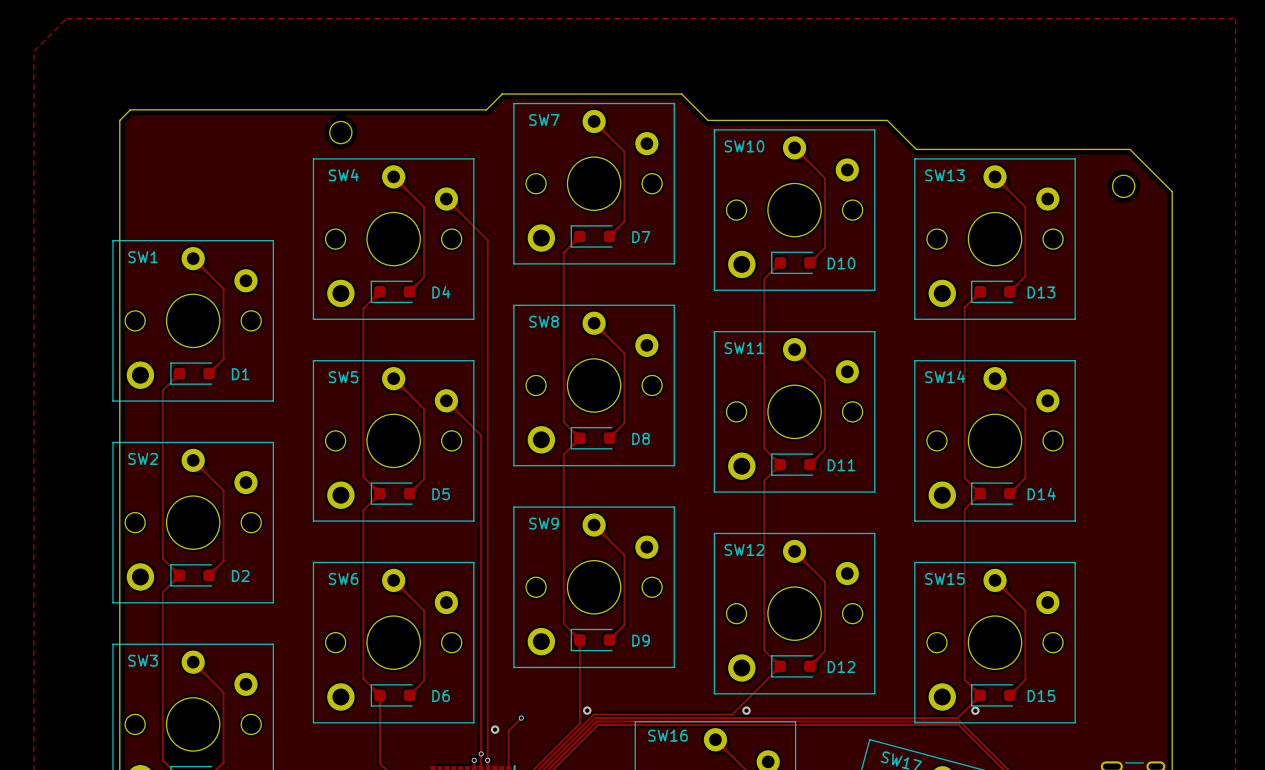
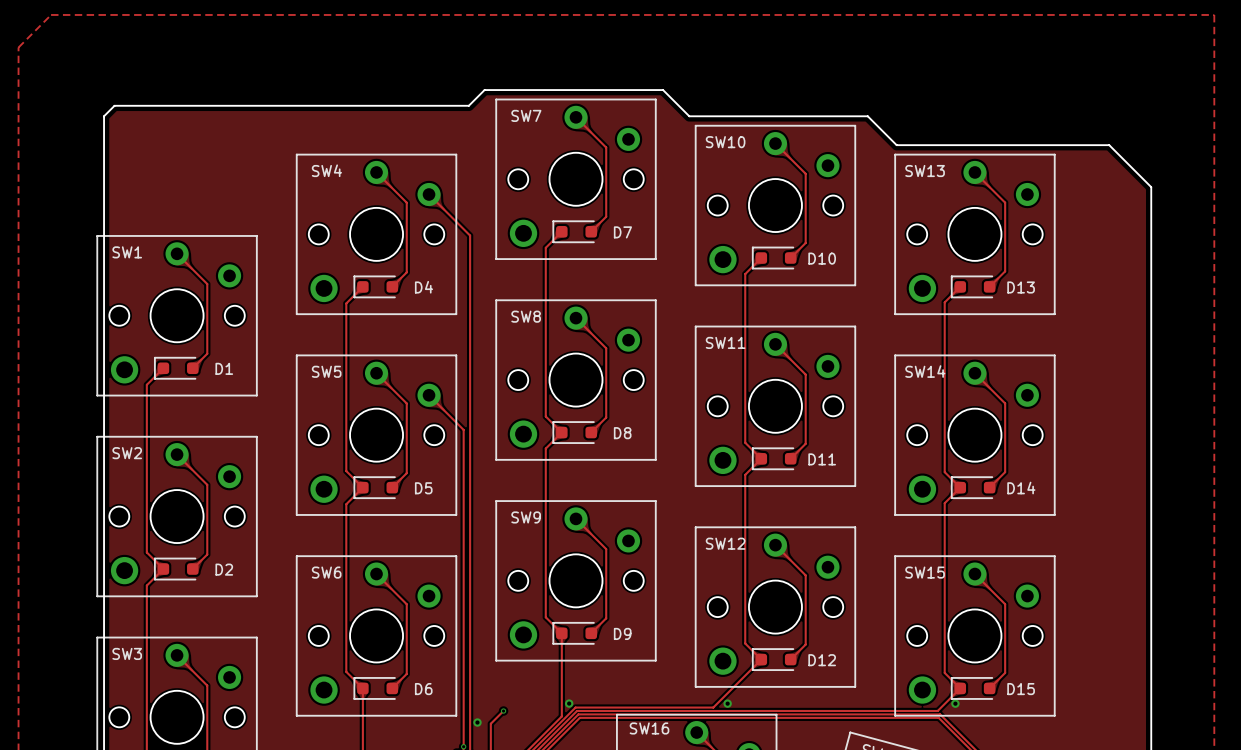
round board edge: [329, 121, 353, 144] -> none
round board edge: [1112, 175, 1136, 198] -> none

